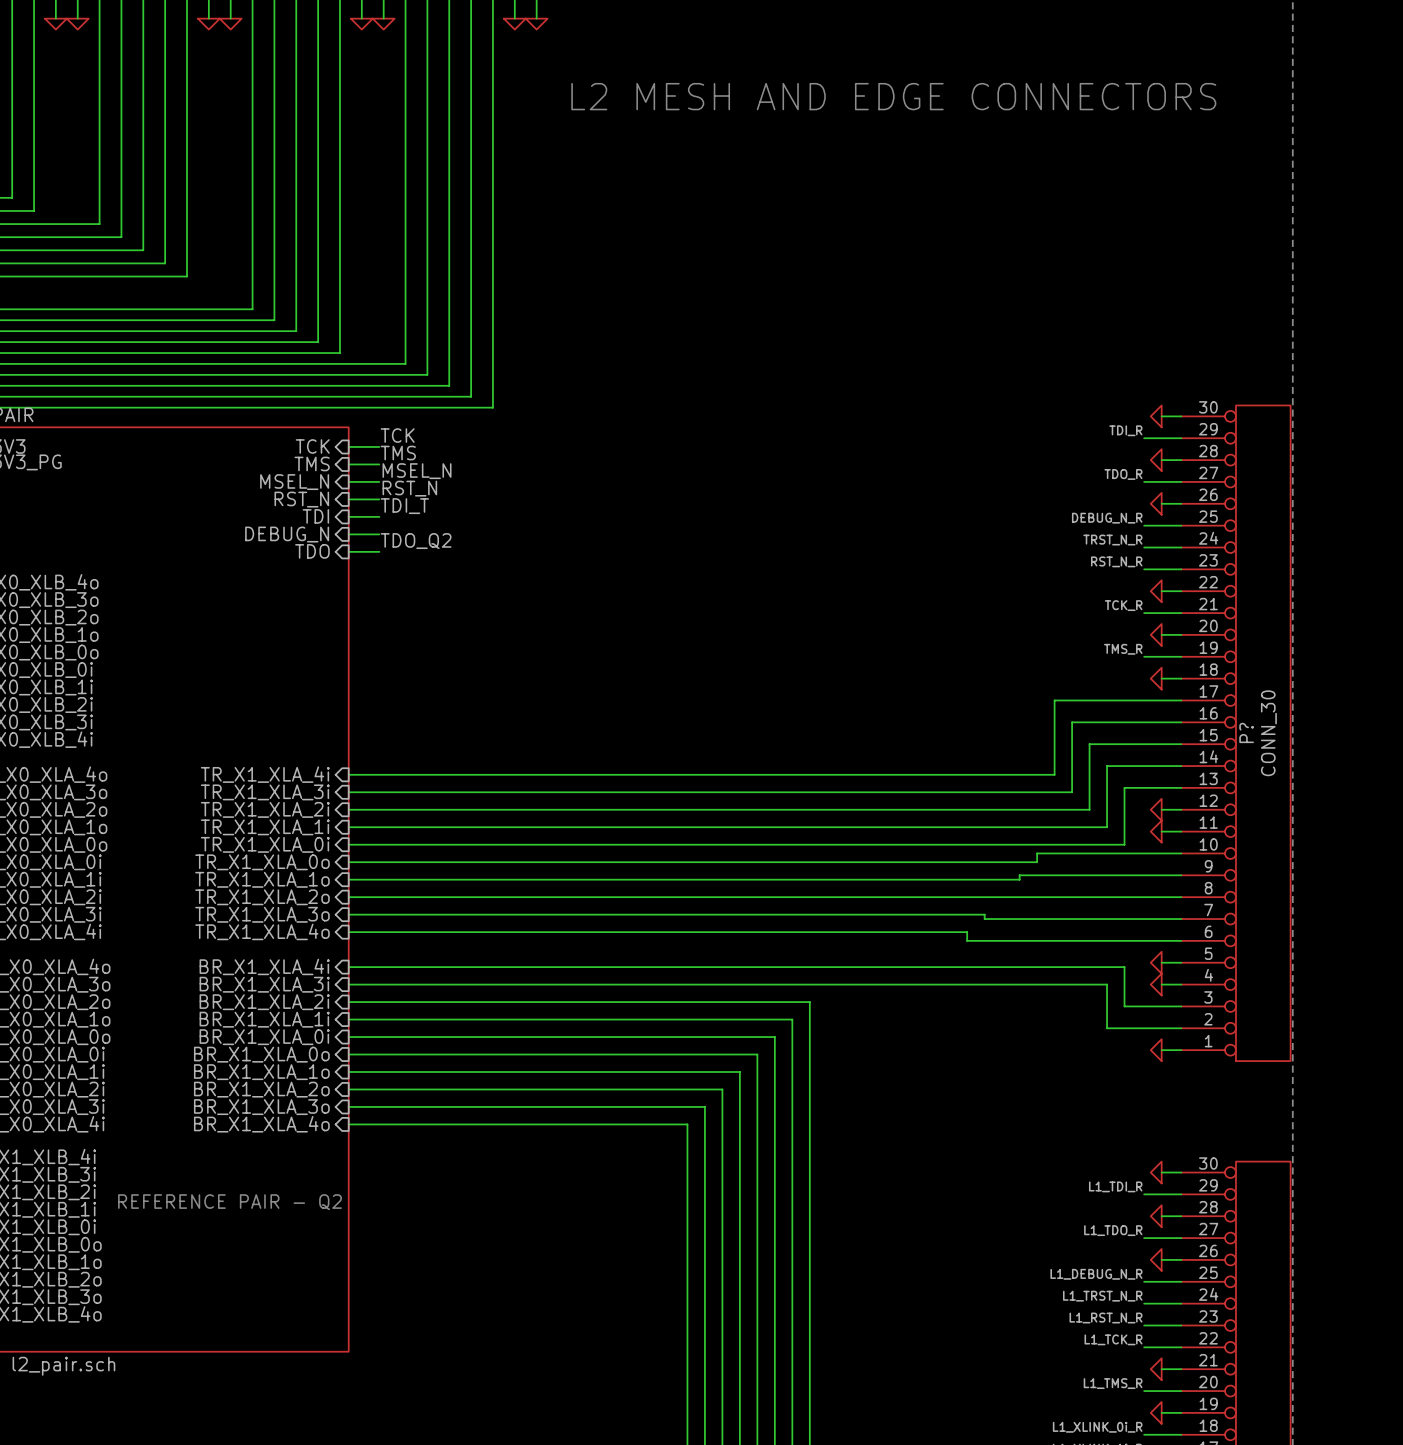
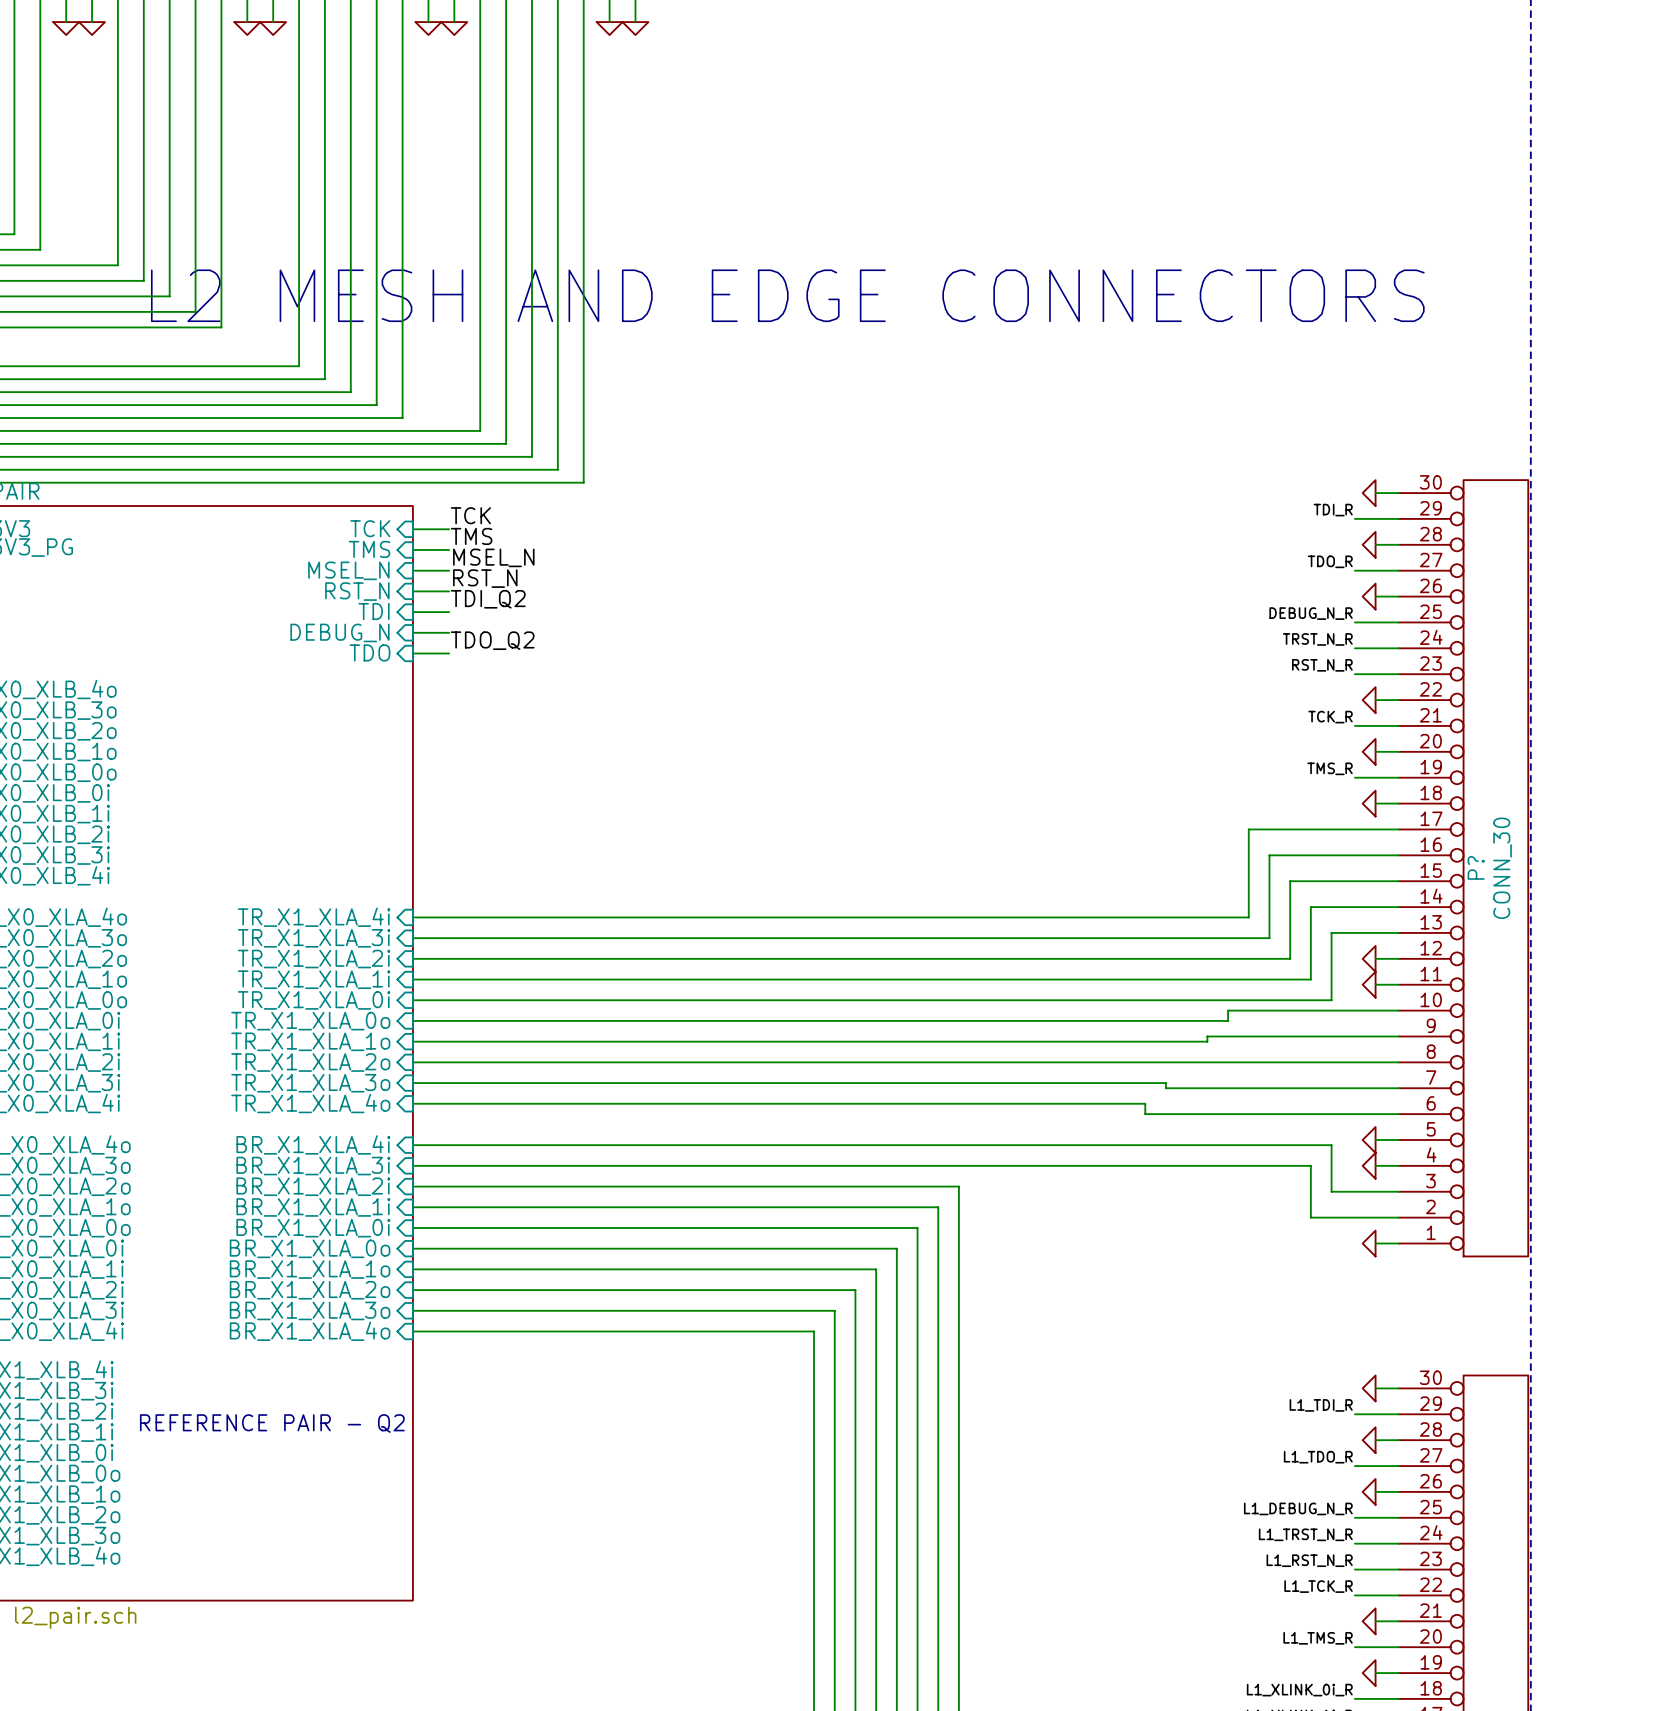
text: L2 MESH AND EDGE CONNECTORS (893, 96) -> none
text: none -> L2 MESH AND EDGE CONNECTORS (787, 295)
label: TDI_T (404, 506) -> TDI_Q2 (488, 599)

